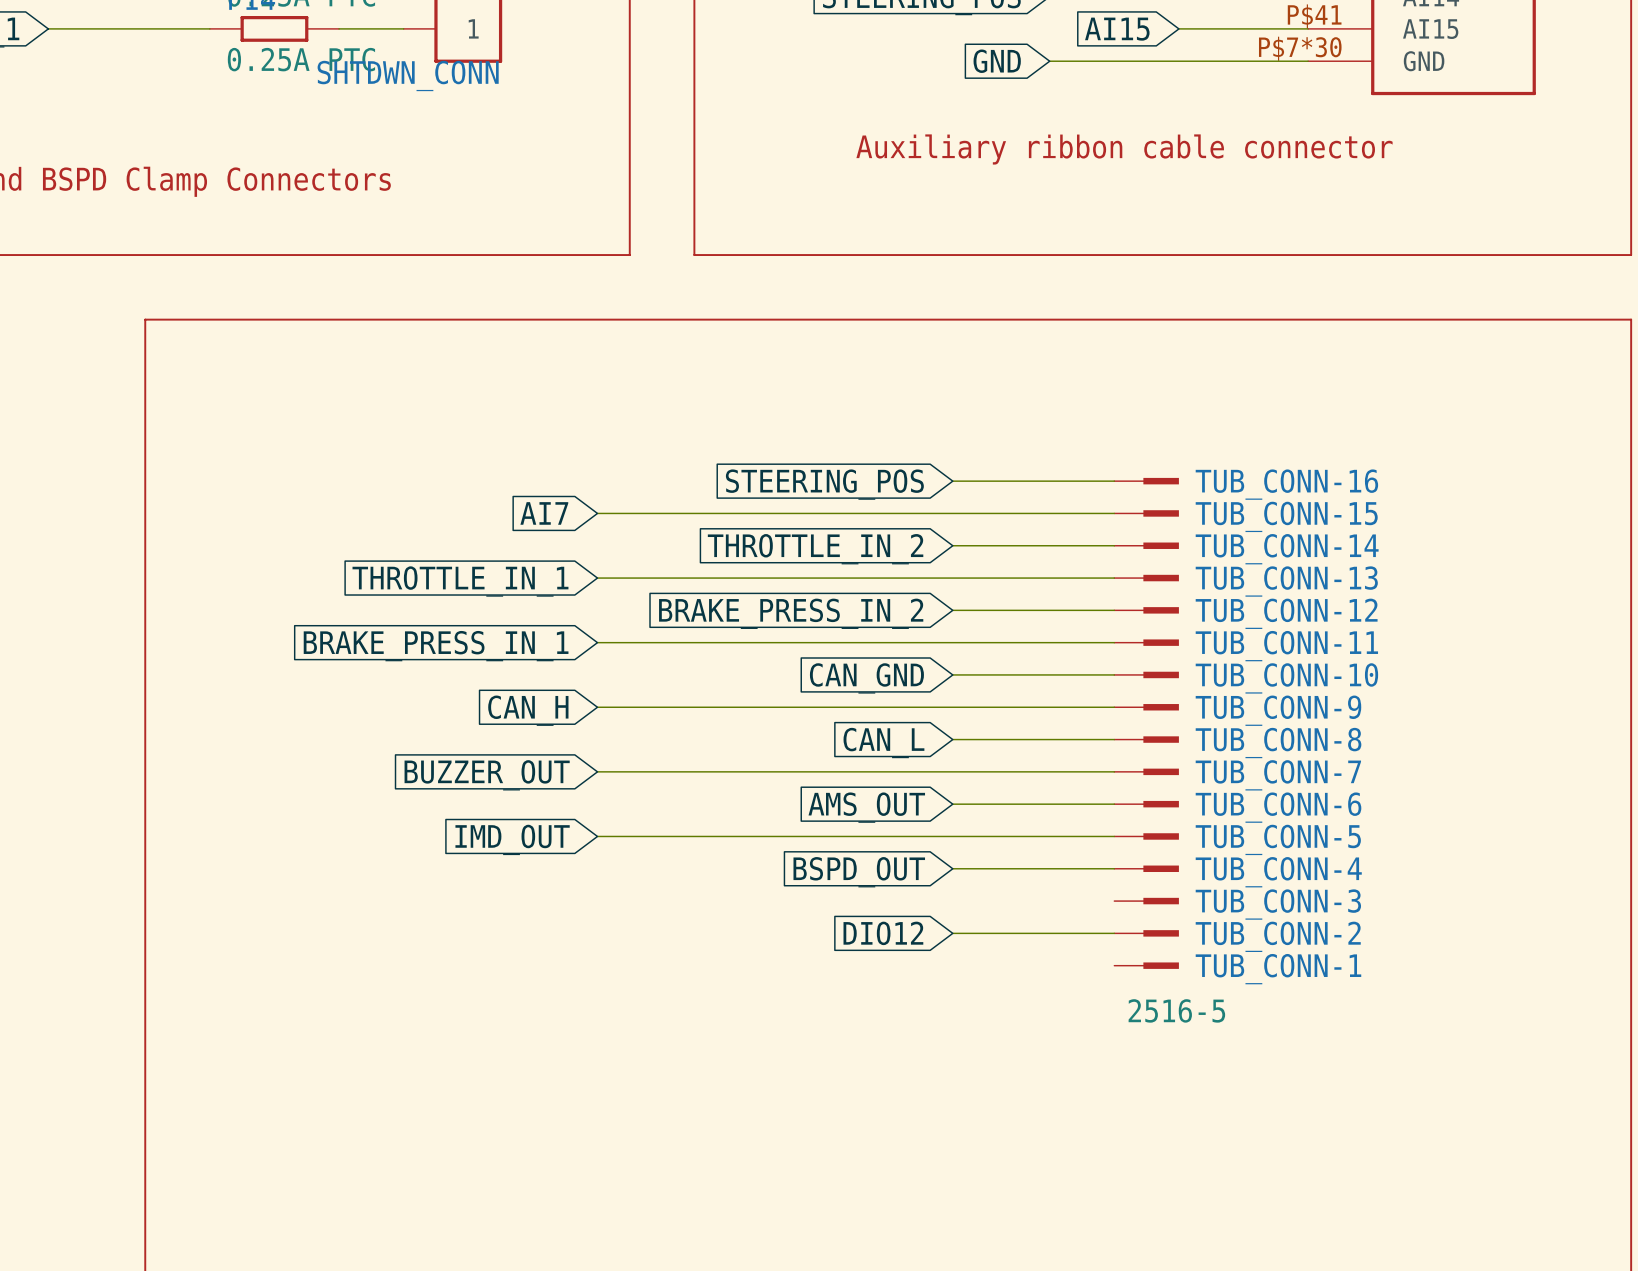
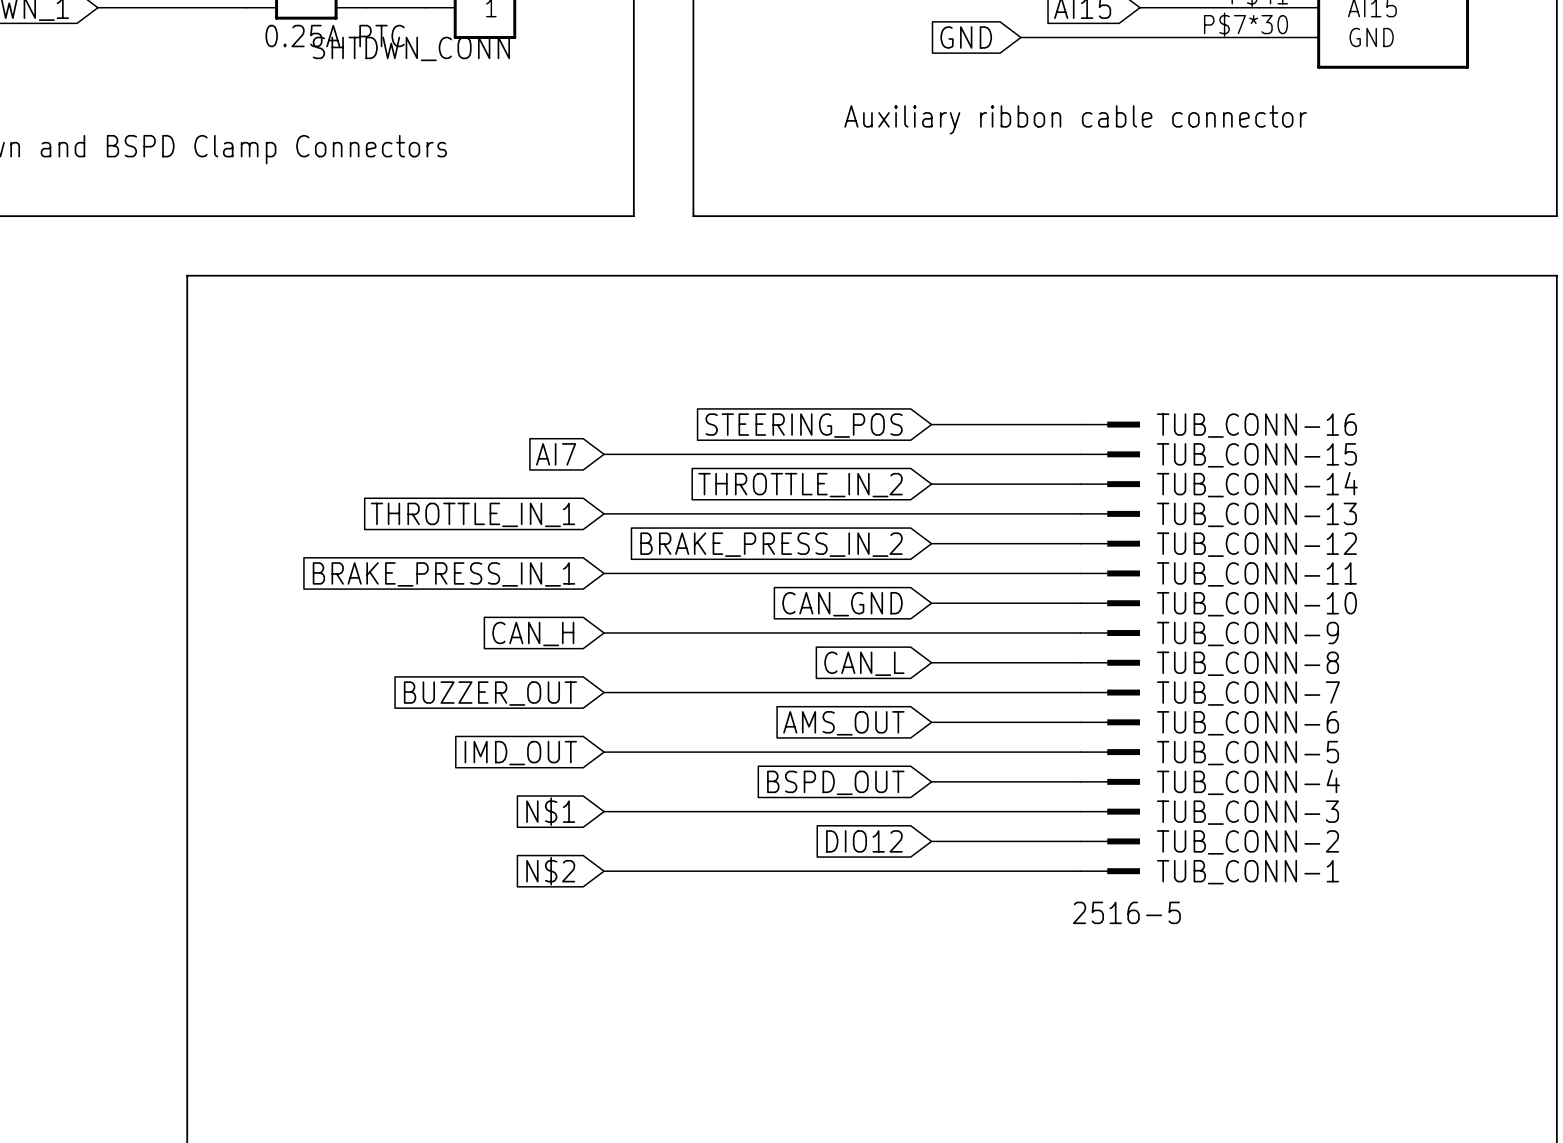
wire: none -> (604, 811) (1080, 811)
global label: none -> N$1 (550, 811)
wire: none -> (604, 871) (1080, 871)
global label: none -> N$2 (550, 871)

